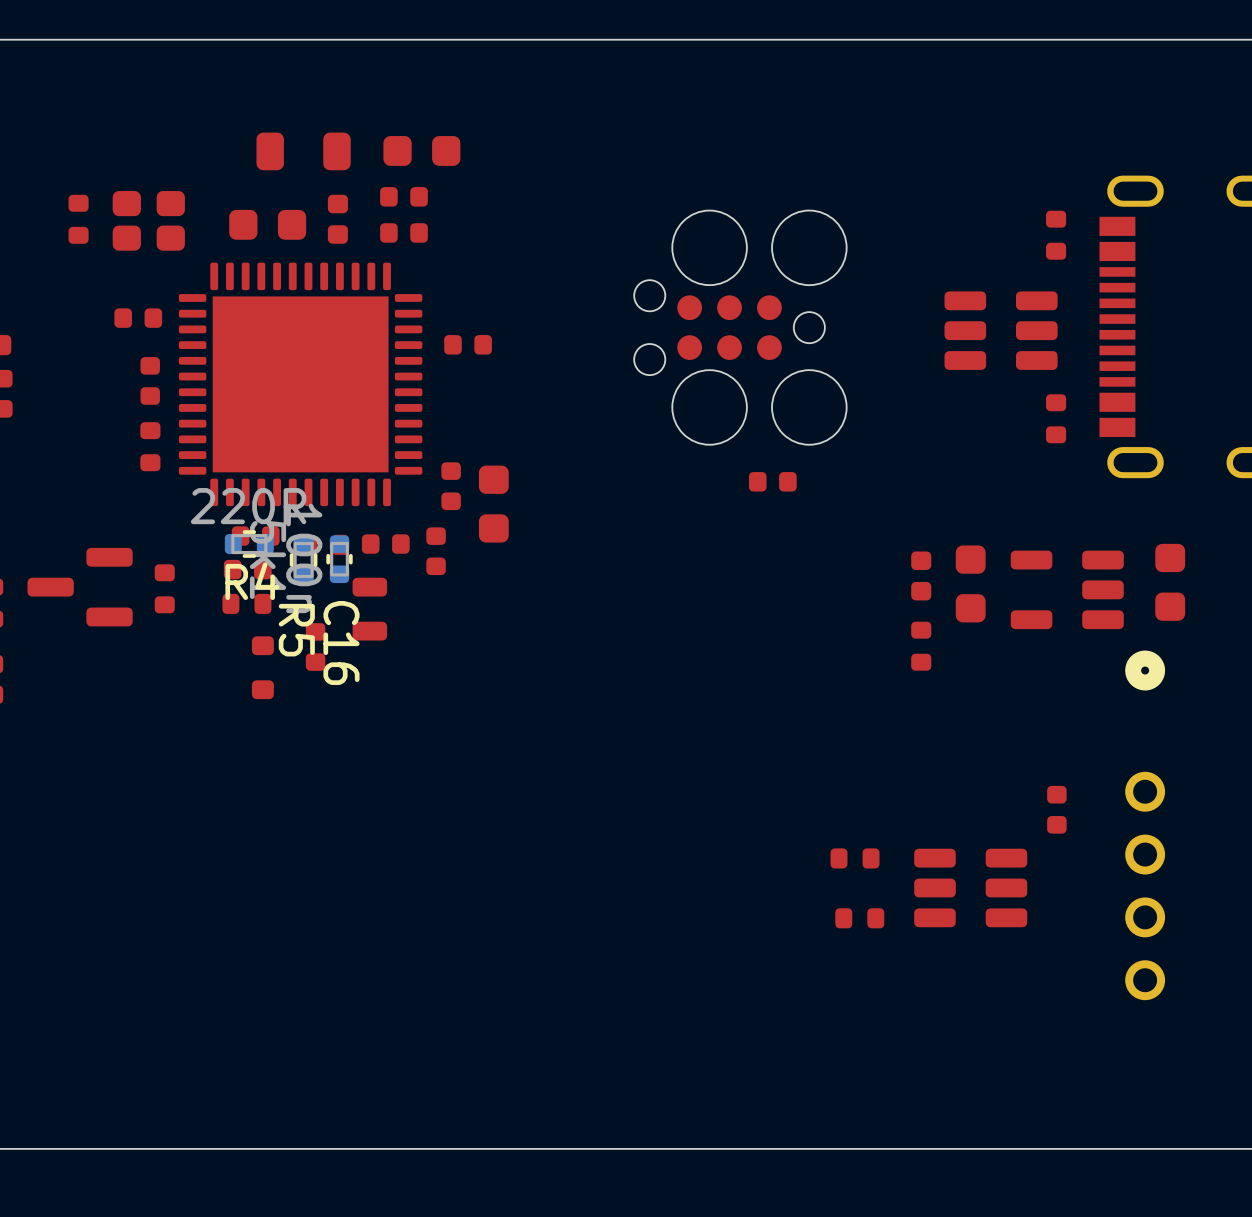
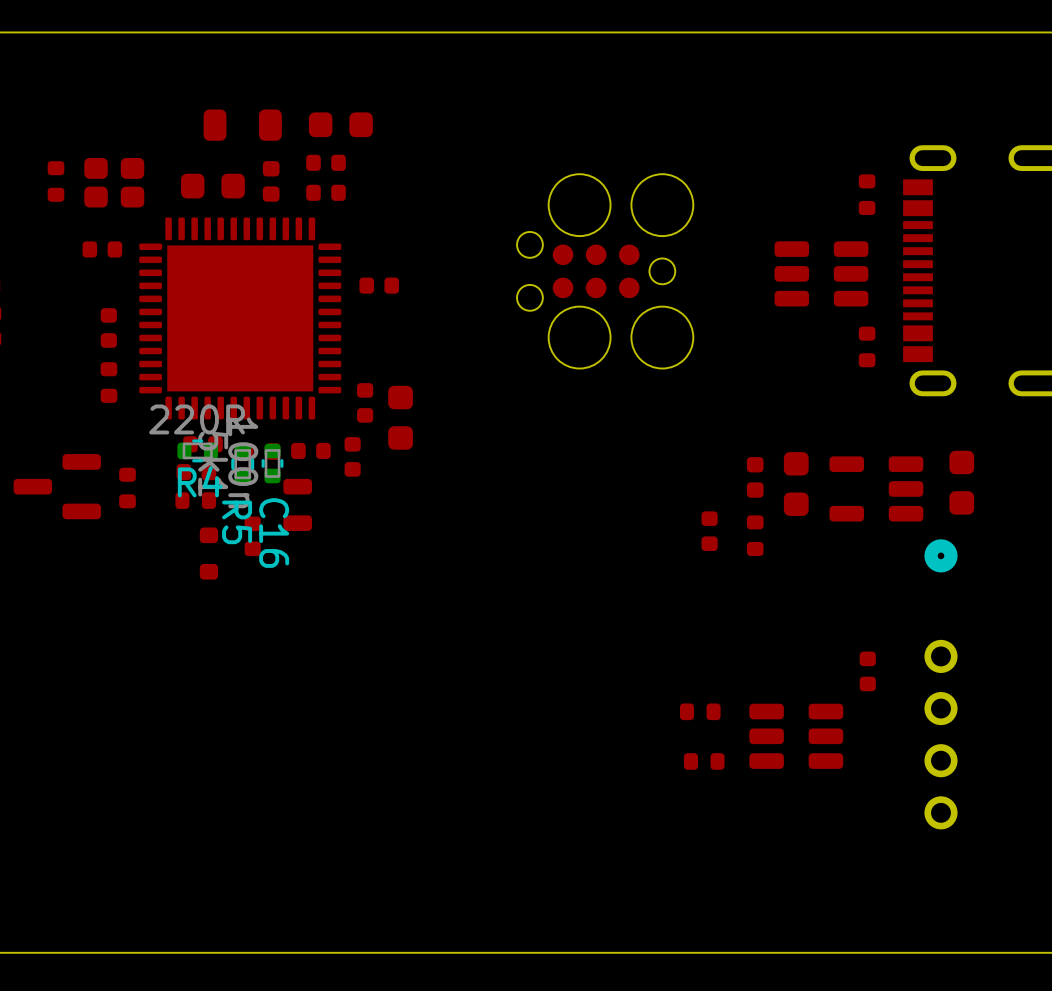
part position: (138, 318) -> (102, 249)
part position: (150, 380) -> (108, 327)
part position: (150, 446) -> (108, 382)
part rotation: 0° (772, 481) -> 90° clockwise (709, 531)
part position: (772, 481) -> (709, 531)

